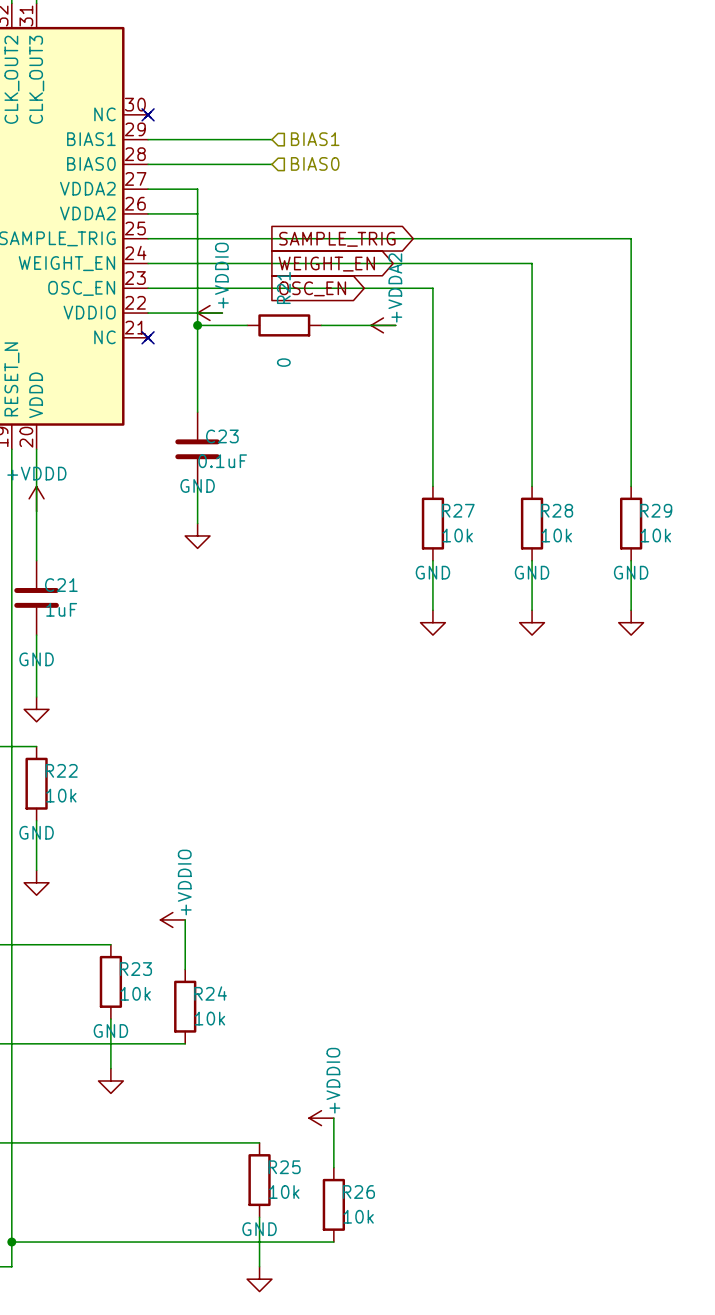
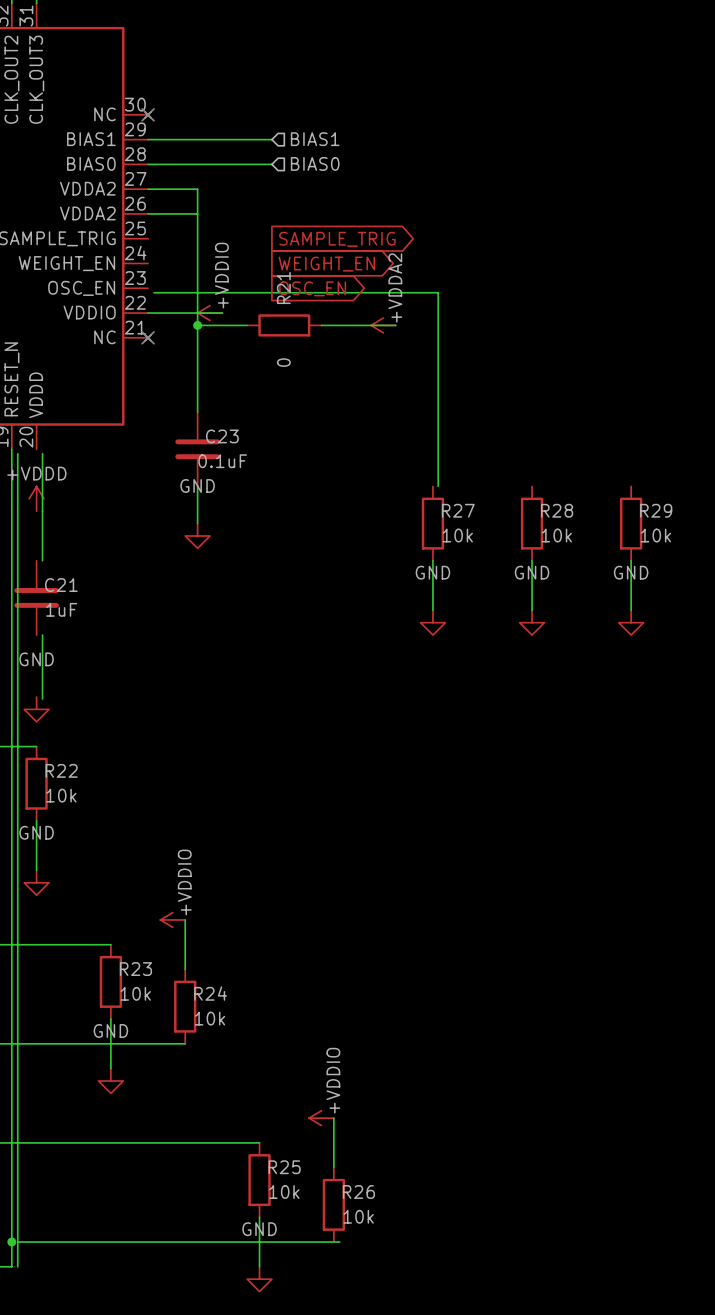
wire: (148, 238) (631, 238) (631, 486) -> none
wire: (148, 263) (532, 263) (532, 486) -> none
wire: (148, 288) (432, 288) (432, 486) -> none
wire: none -> (154, 292) (438, 292) (438, 486)
wire: (36, 449) (36, 560) -> none
wire: none -> (17, 453) (17, 1266)
wire: none -> (42, 453) (42, 560)
wire: (36, 635) (36, 697) -> none
wire: none -> (42, 635) (42, 698)
wire: none -> (333, 1242) (339, 1242)

